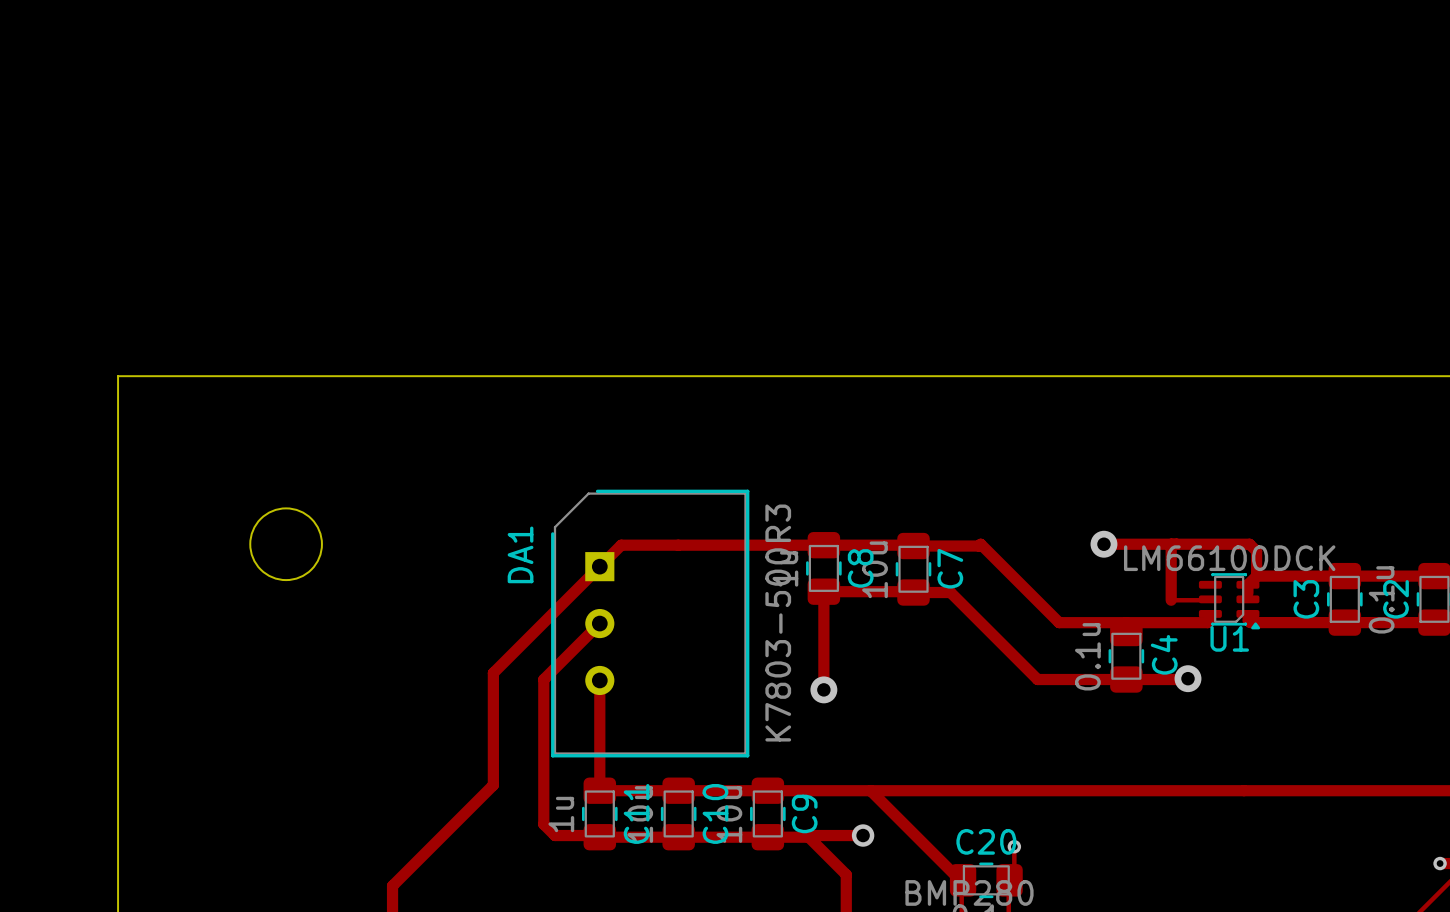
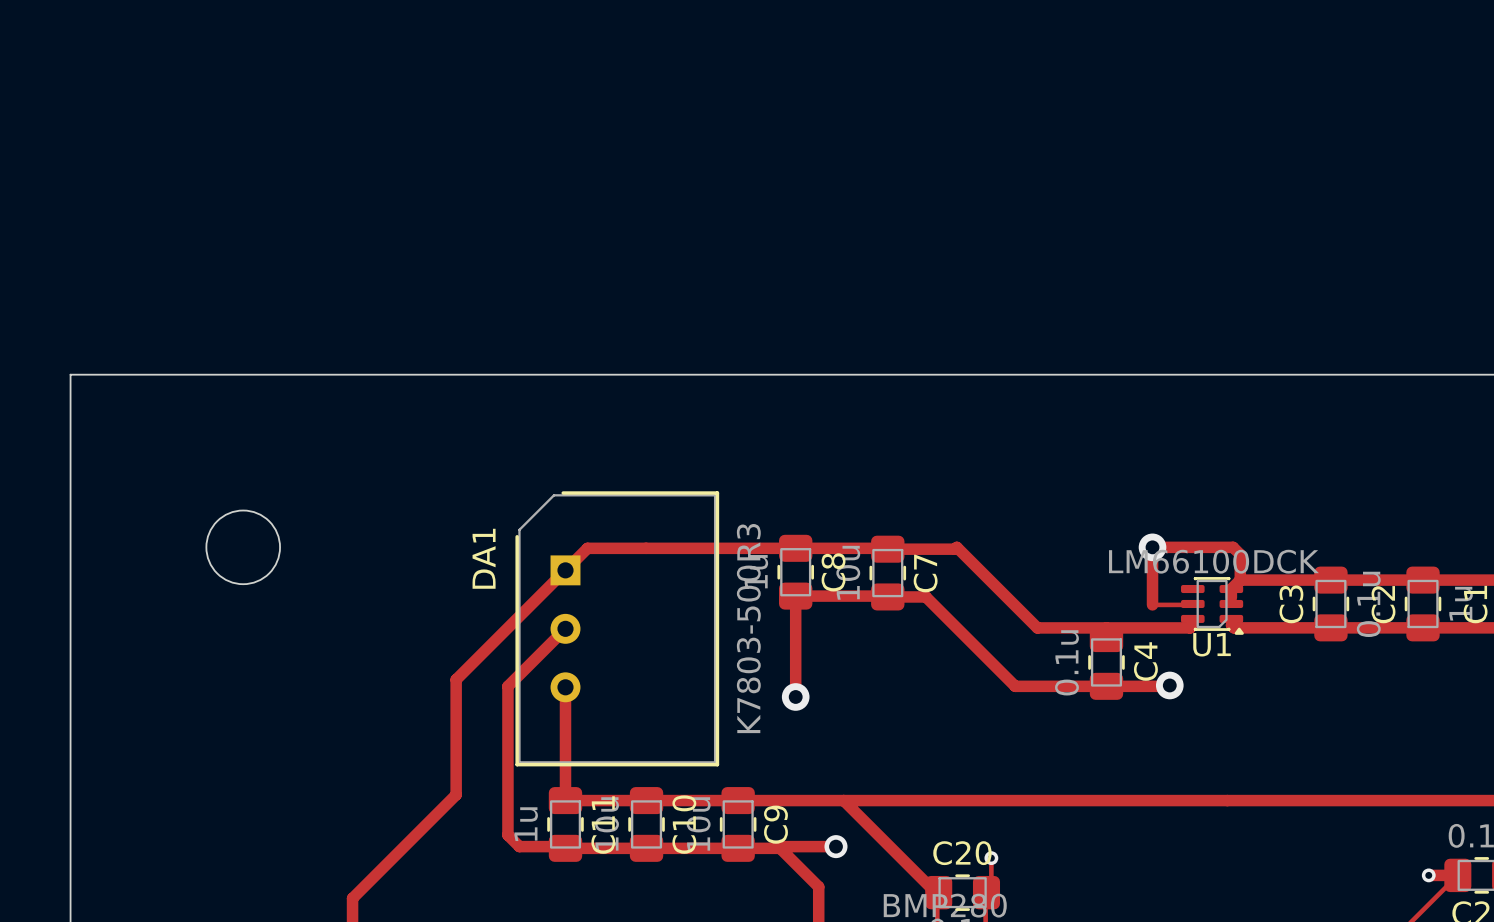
top track: (1103, 544) (1171, 544) -> none
via position: (1103, 544) -> (1152, 547)

